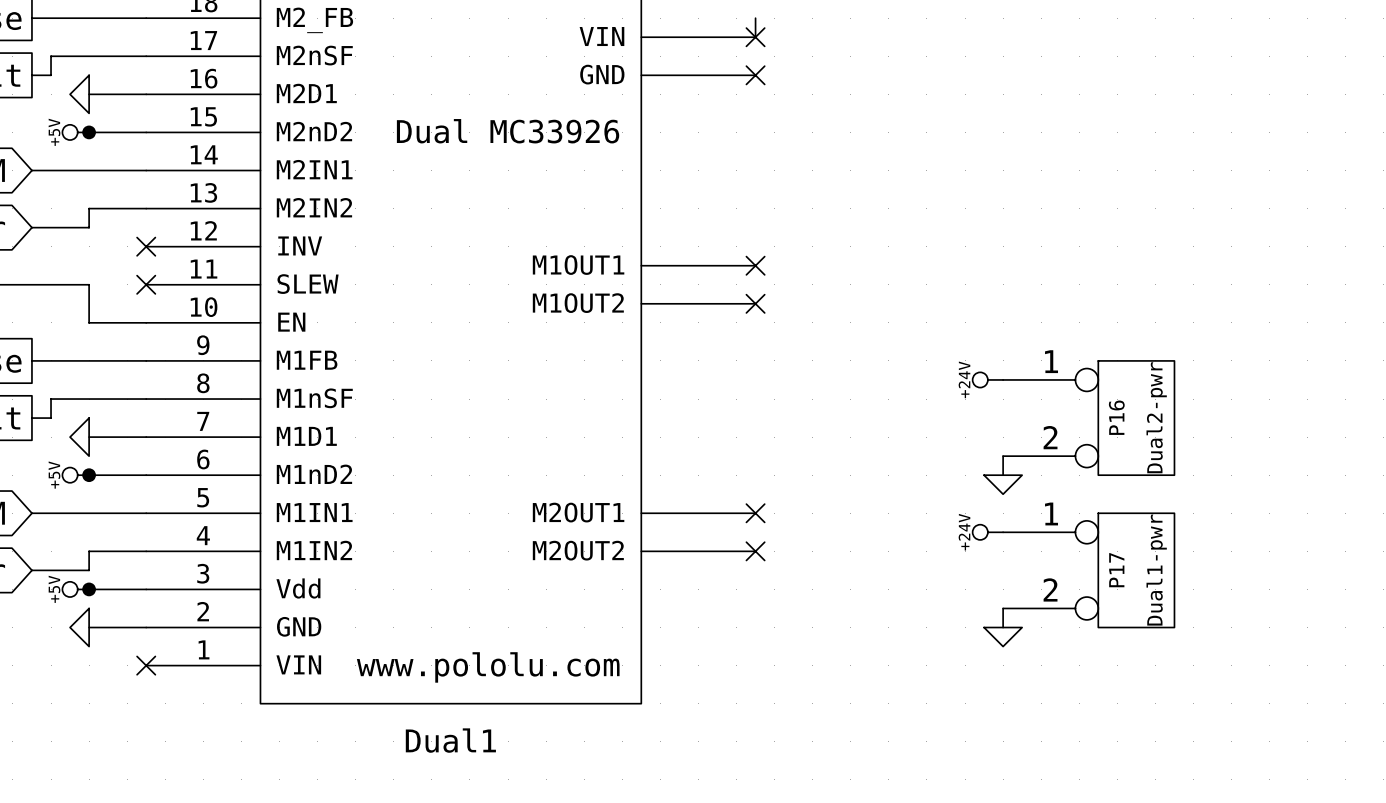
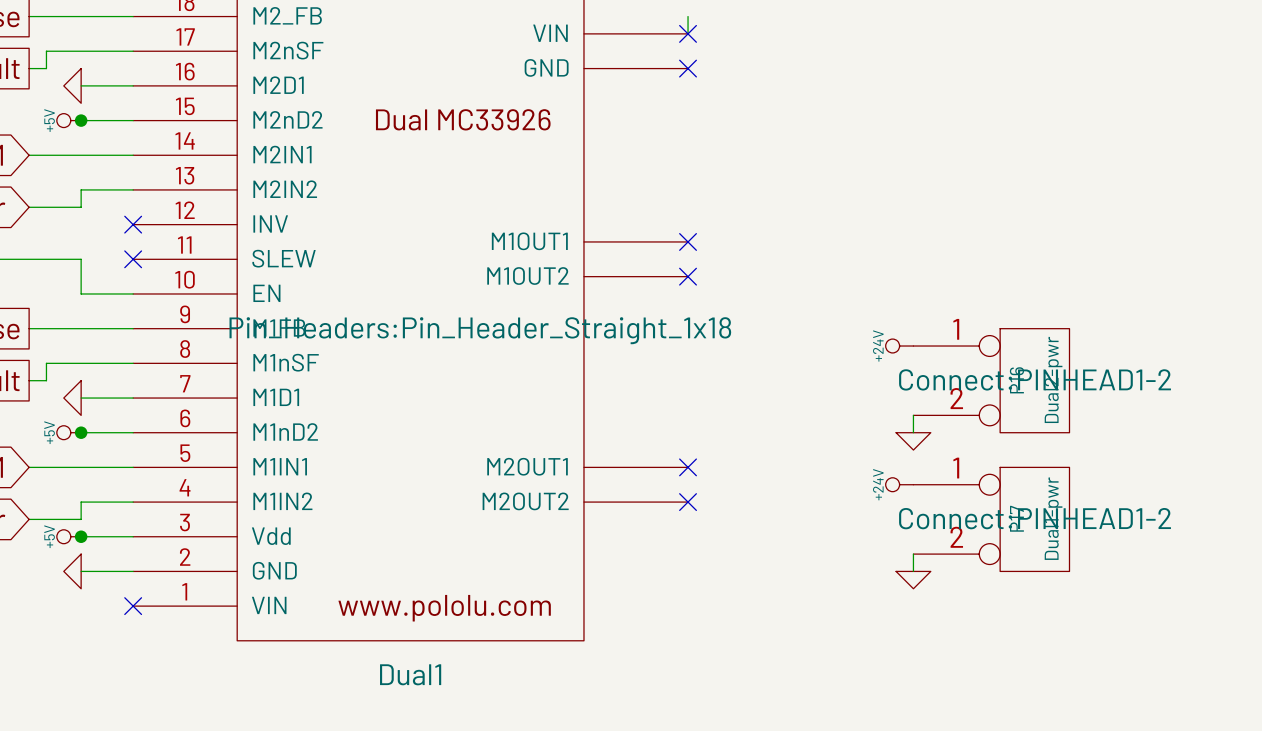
Dual1 text: none -> Pin_Headers:Pin_Header_Straight_1x18 (480, 330)
P16 text: none -> Connect:PINHEAD1-2 (1035, 379)
P17 text: none -> Connect:PINHEAD1-2 (1035, 518)

